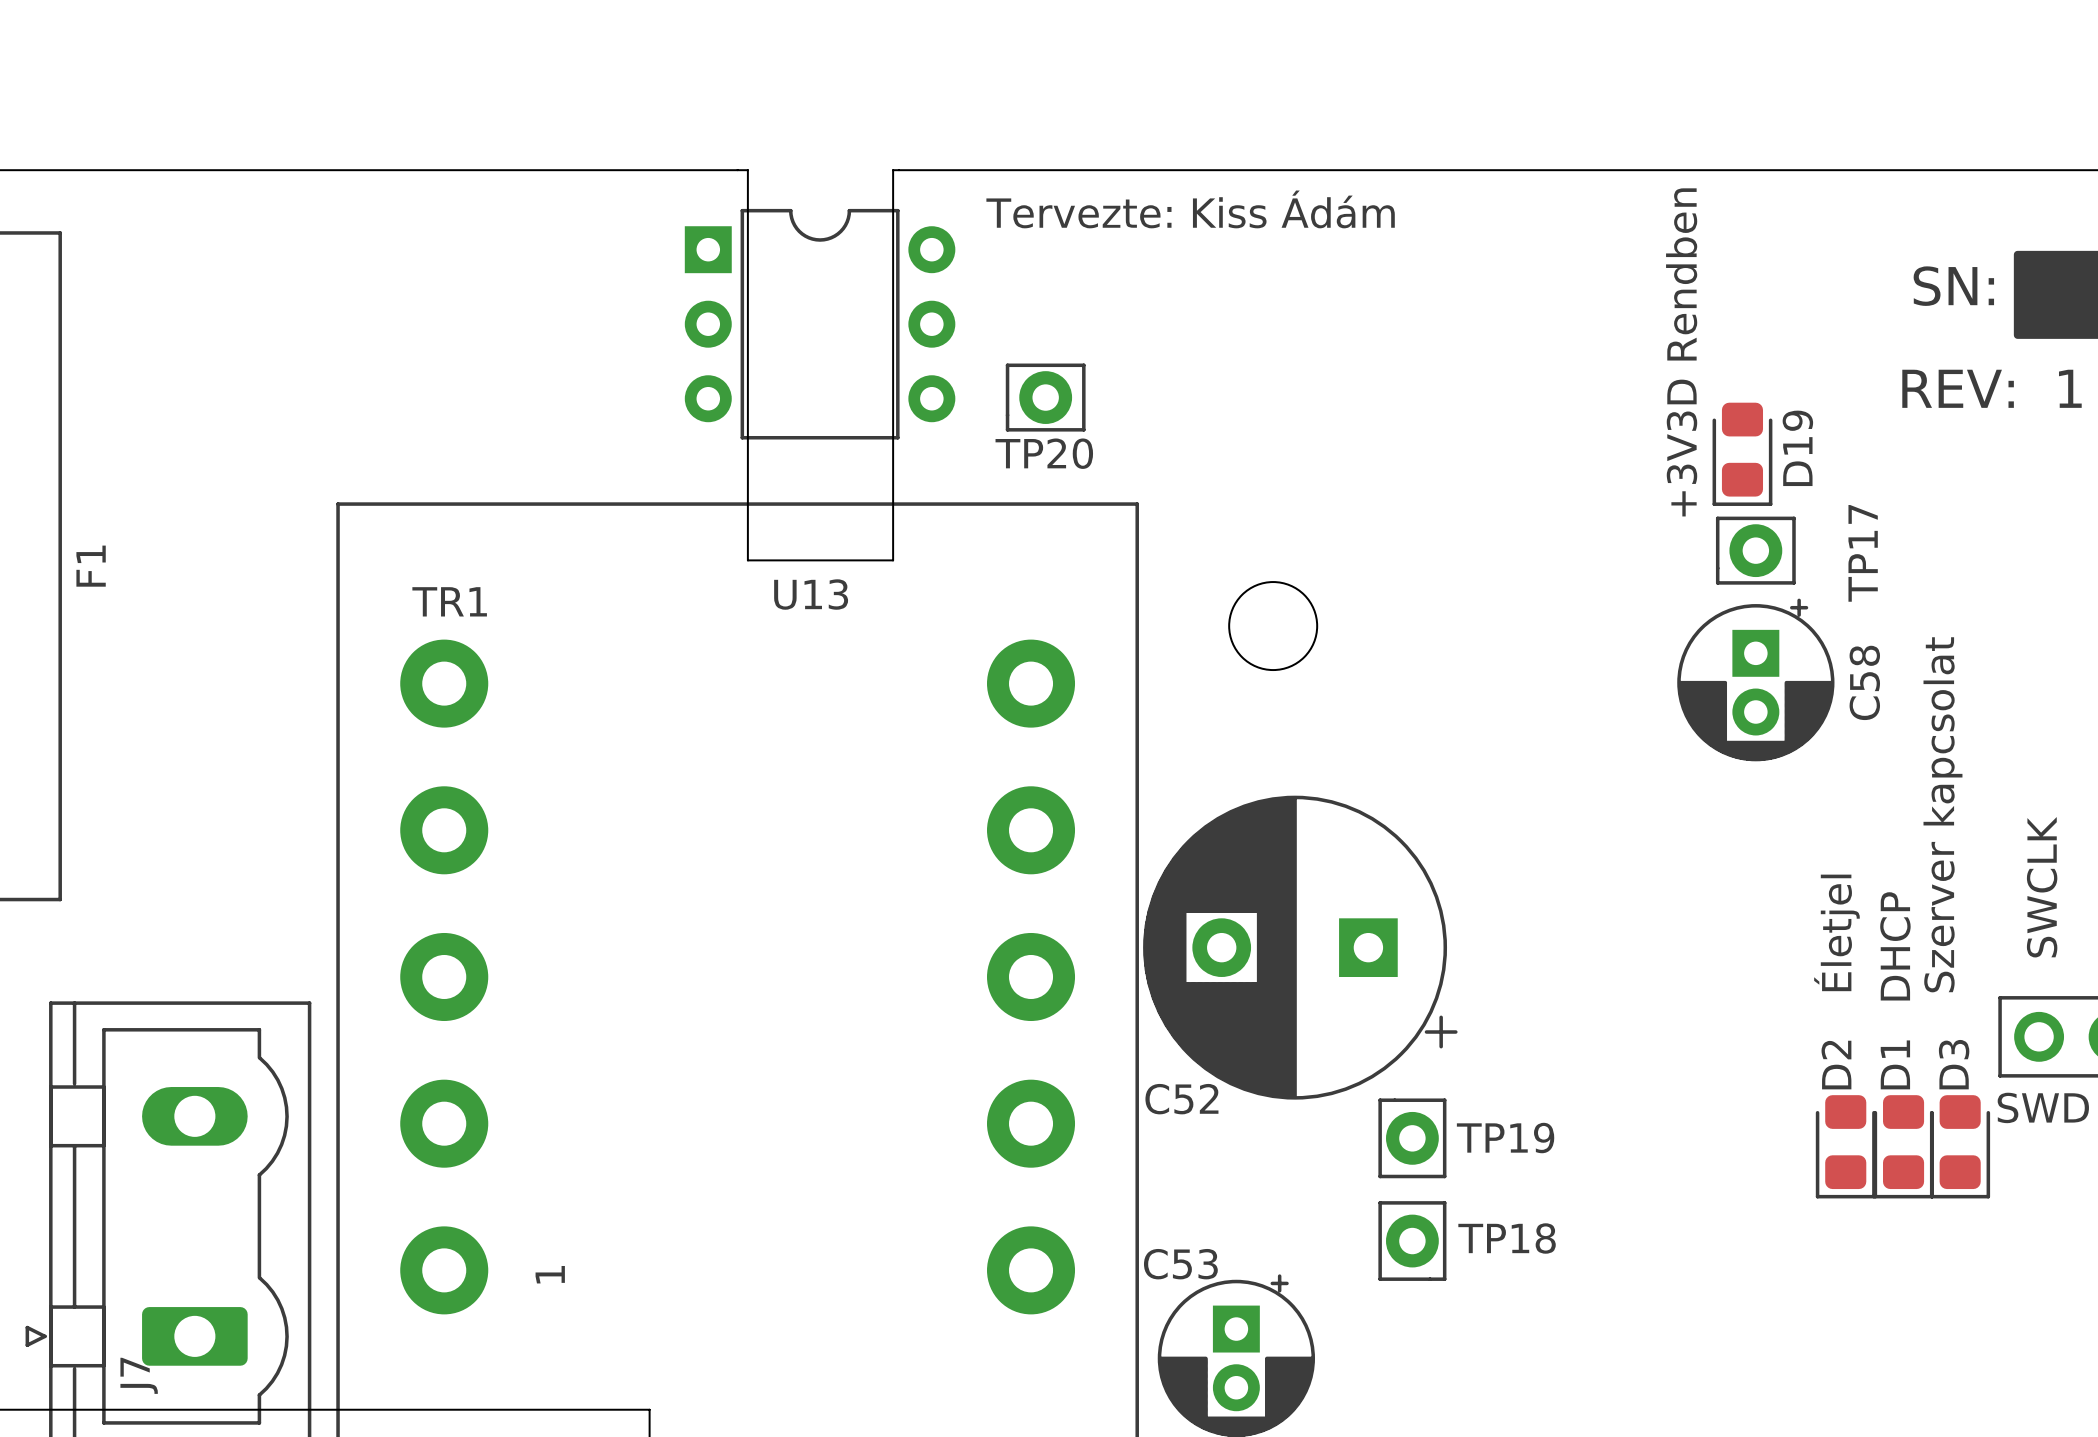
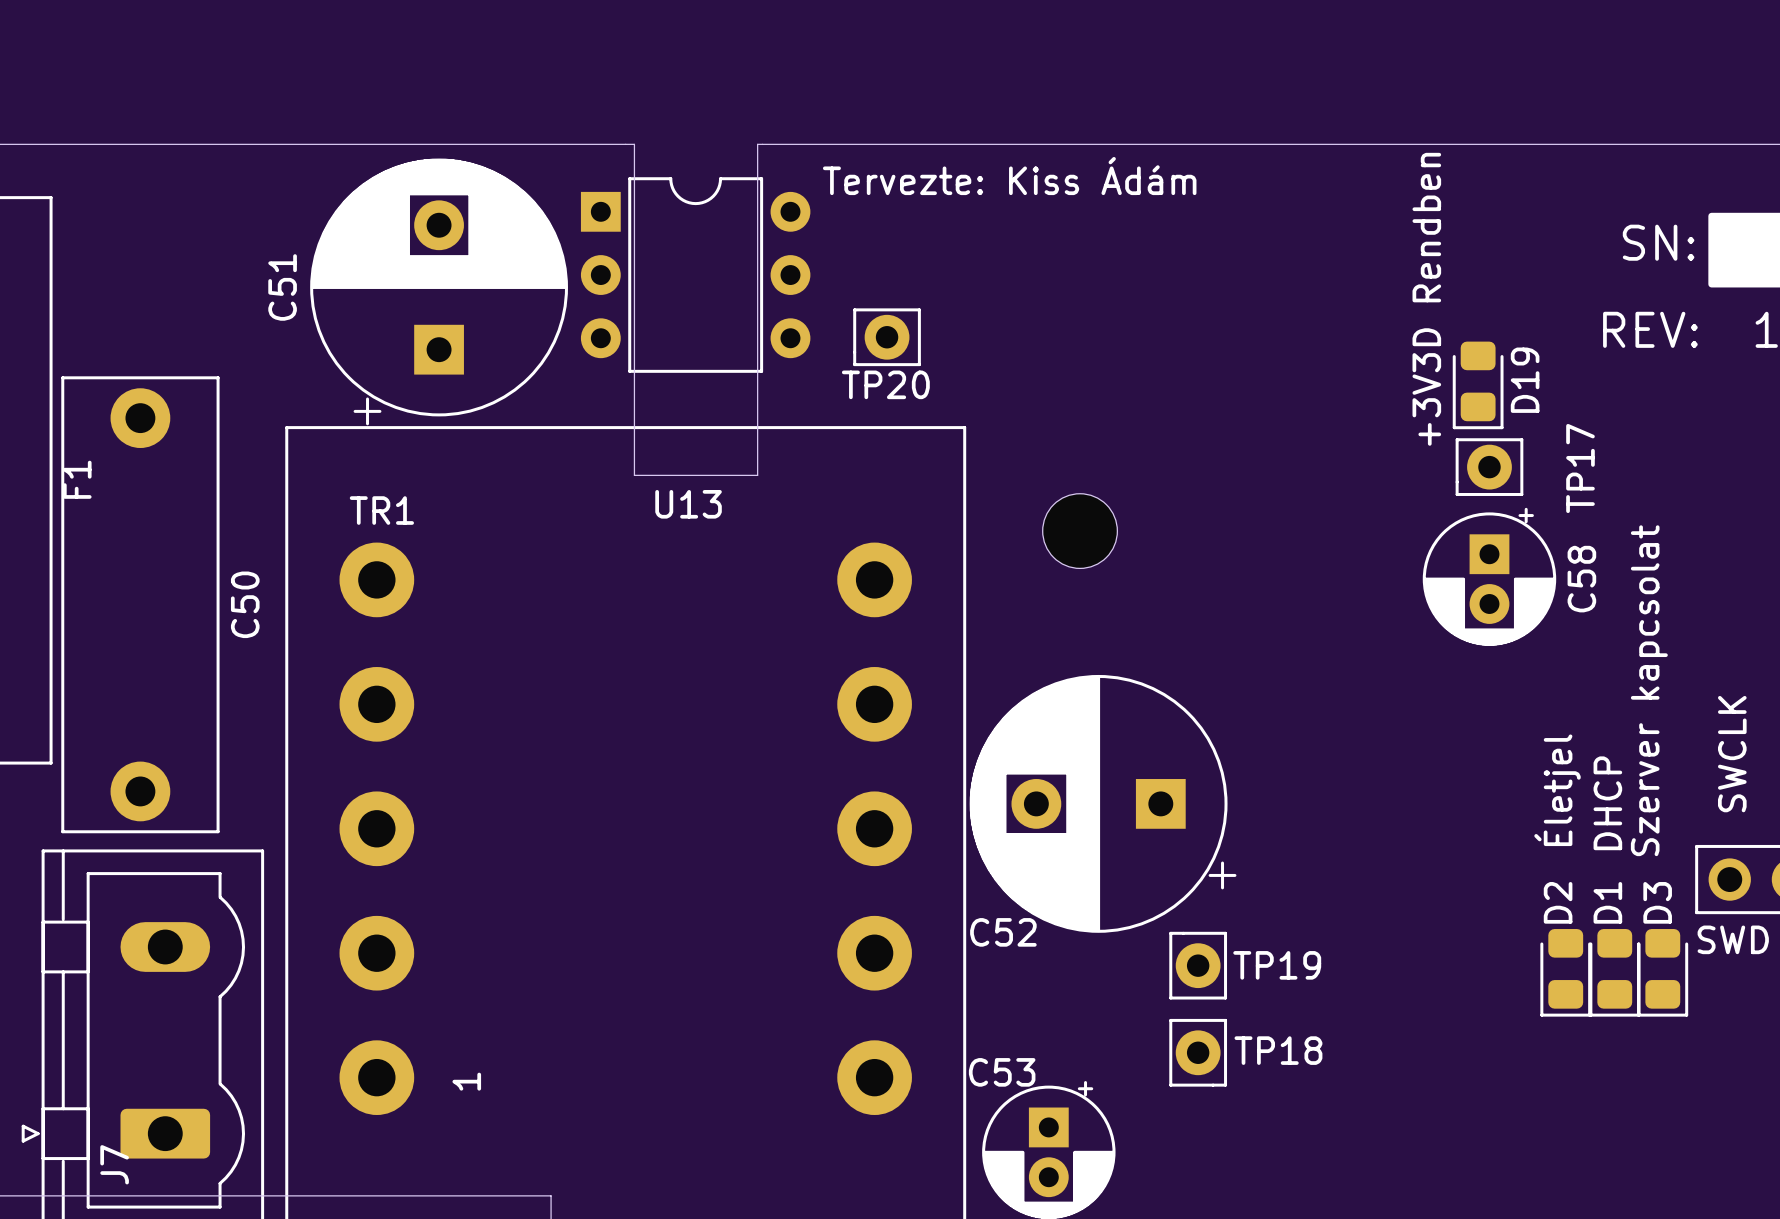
C51: none -> (439, 291)
C50: none -> (140, 604)

